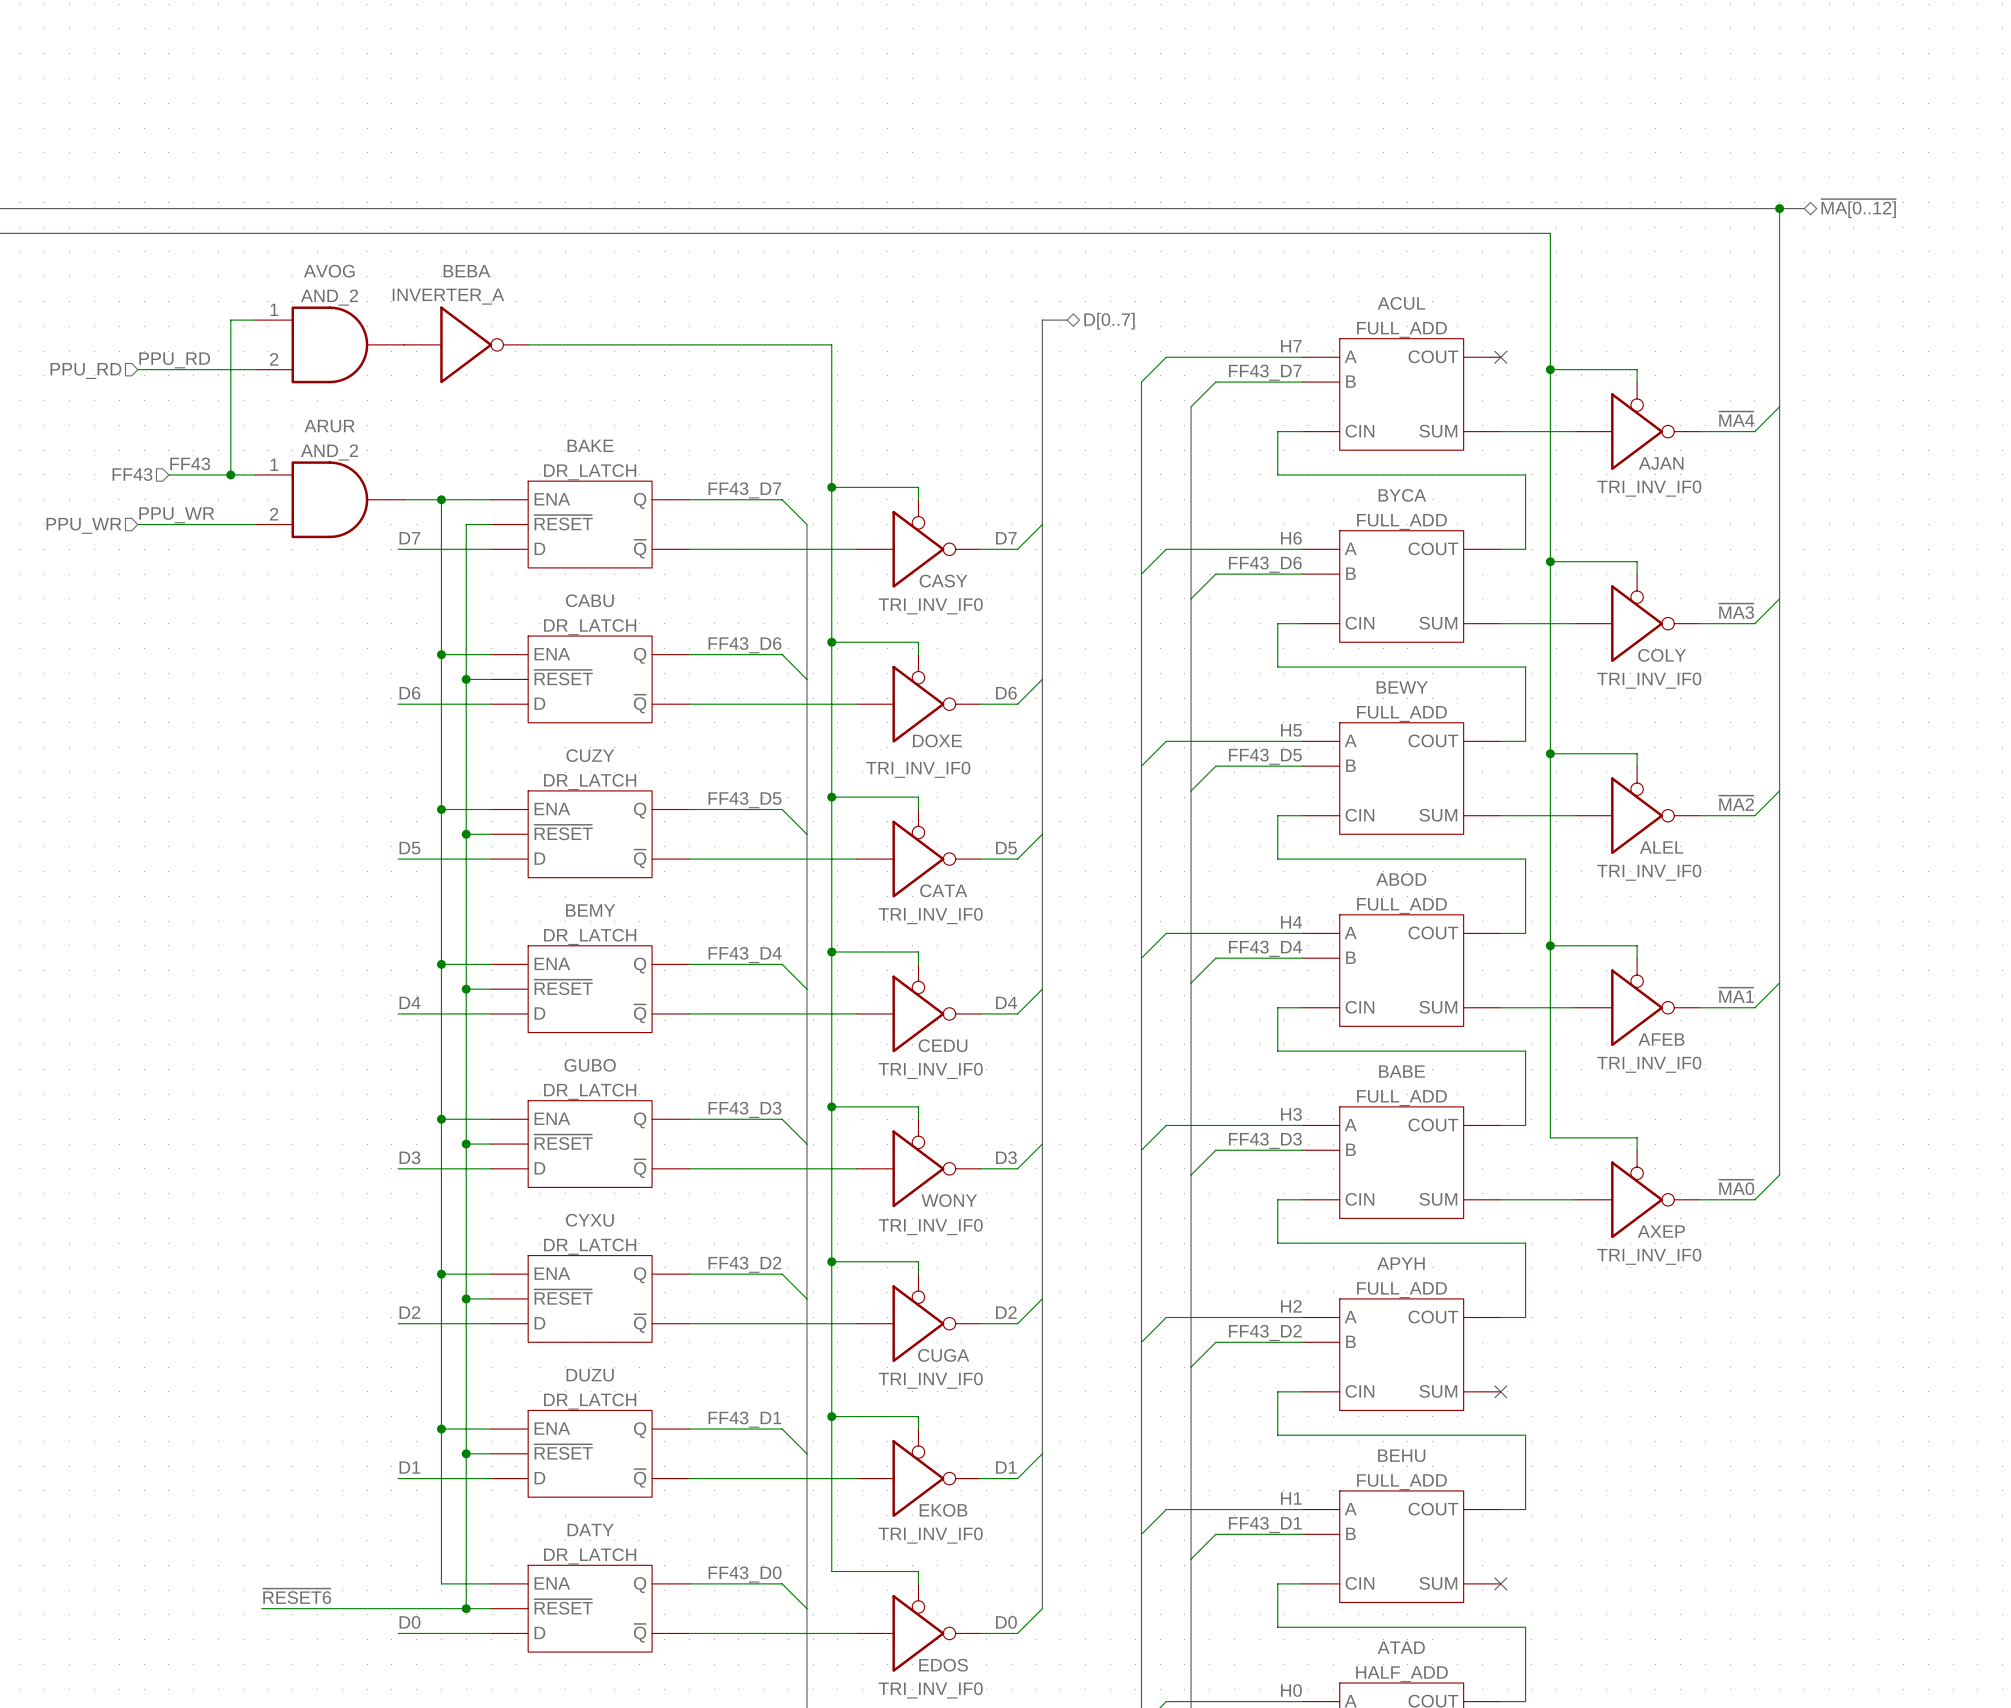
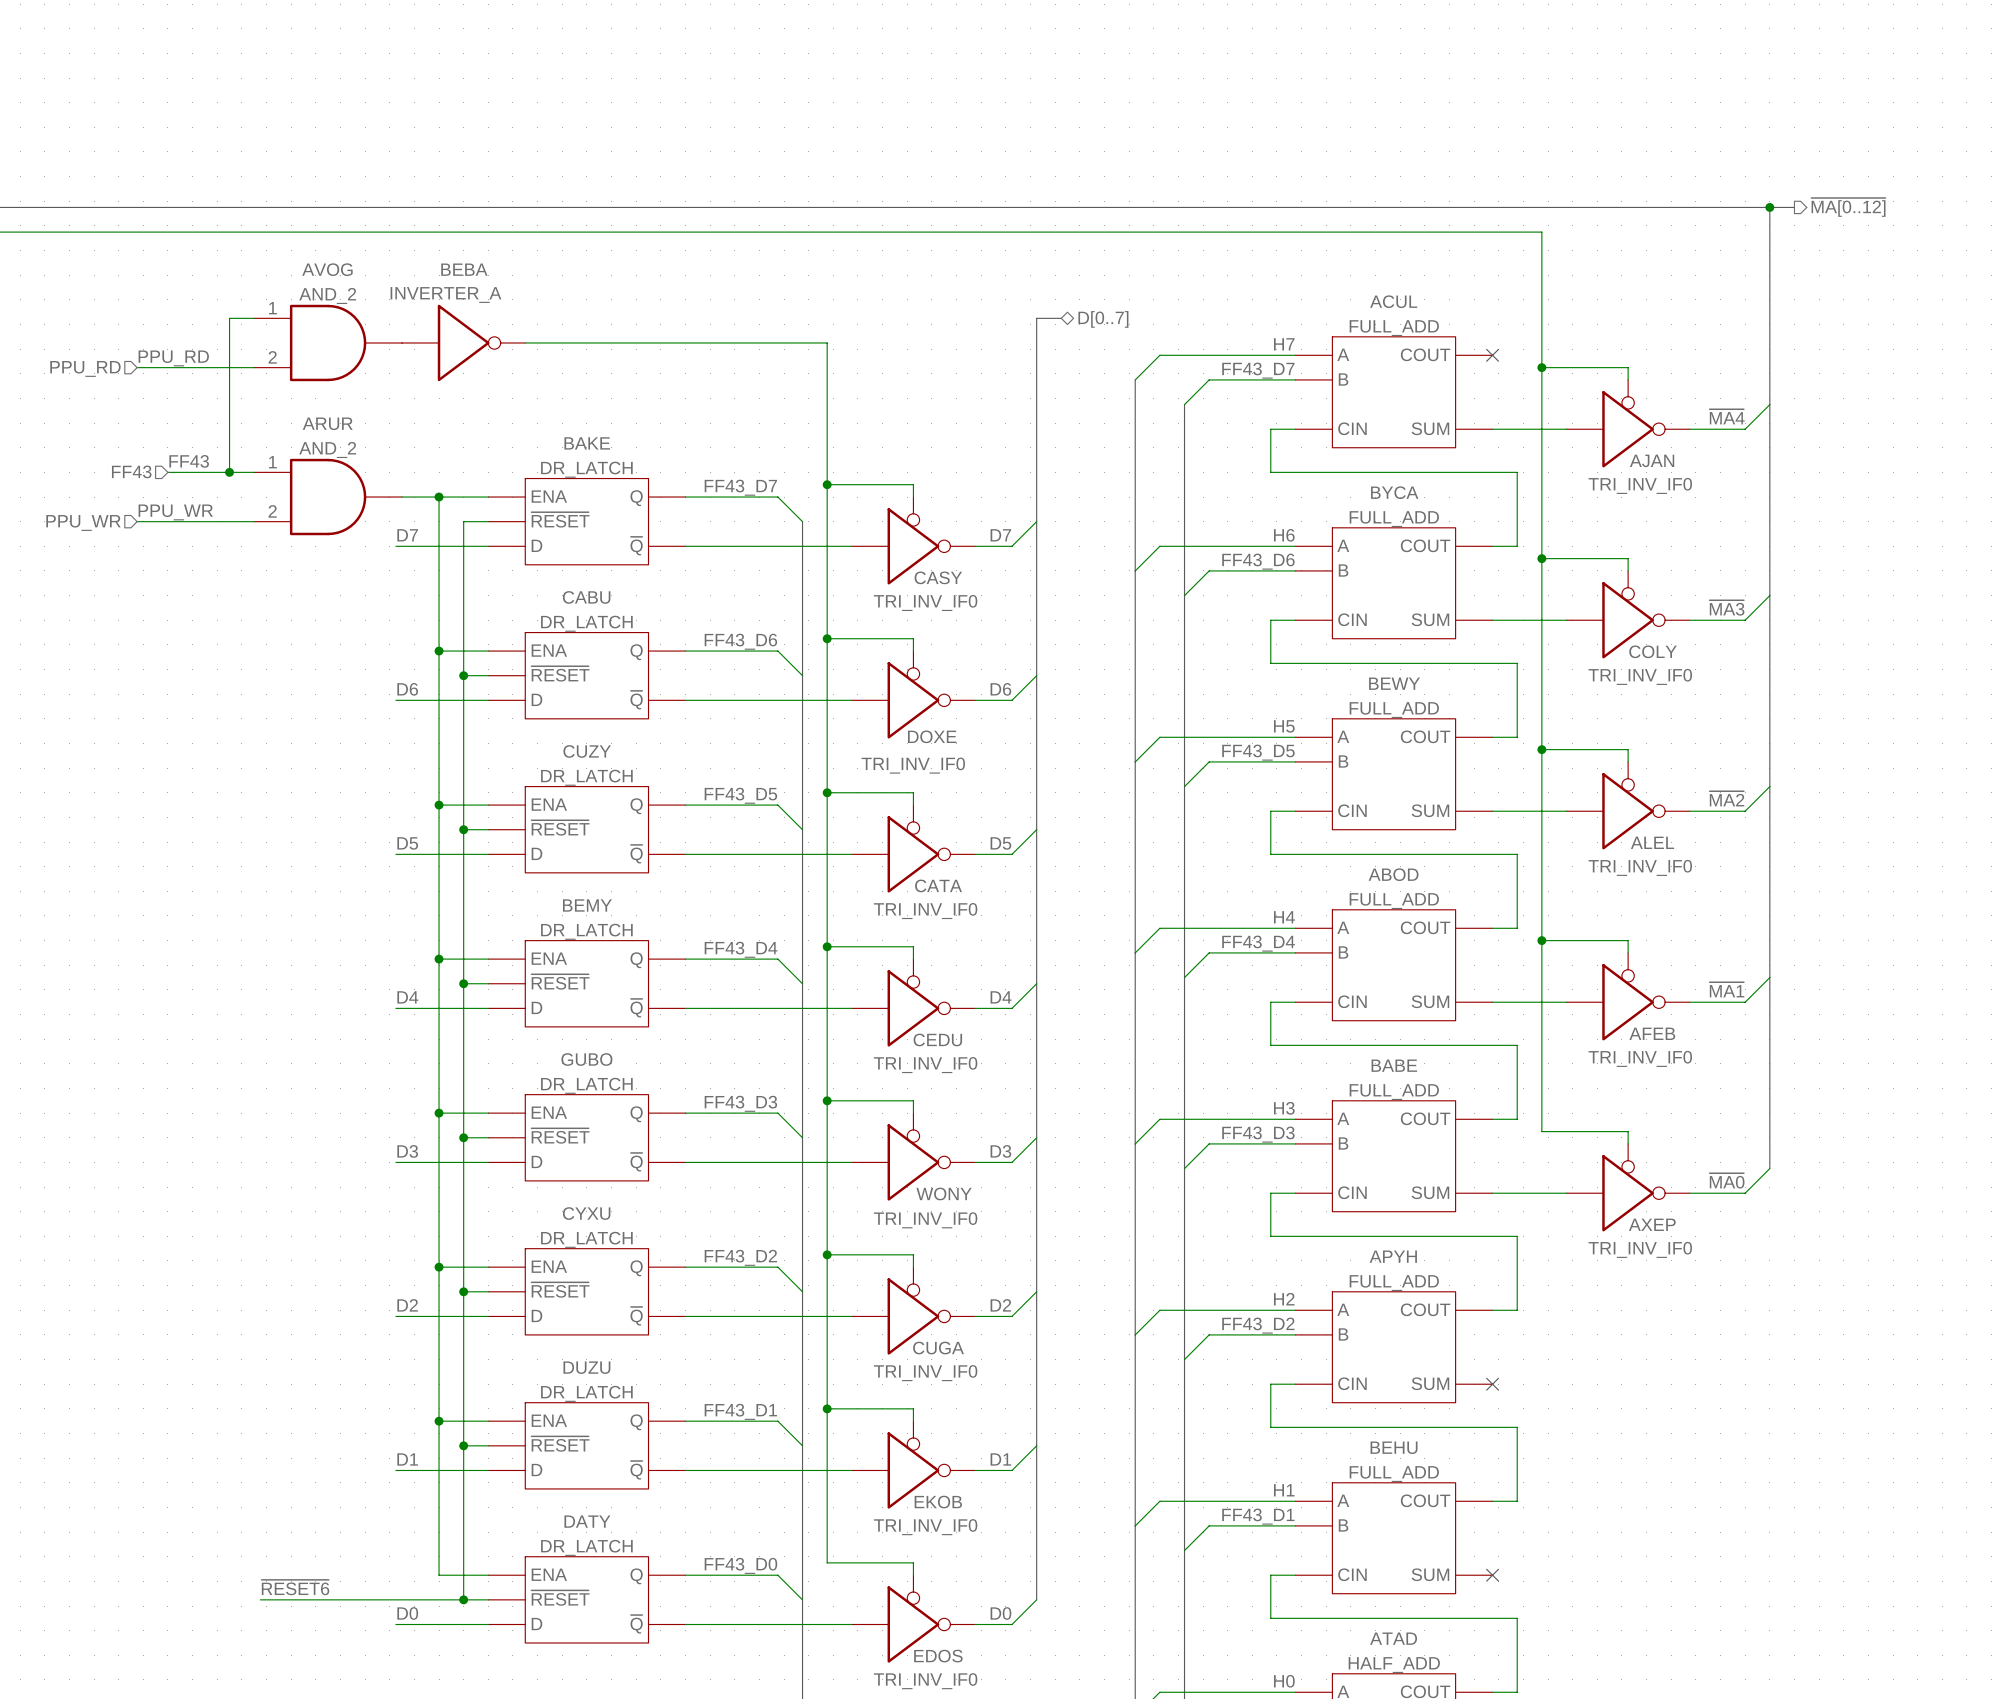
hierarchical label shape: bidirectional (1858, 208) -> output (1848, 207)

